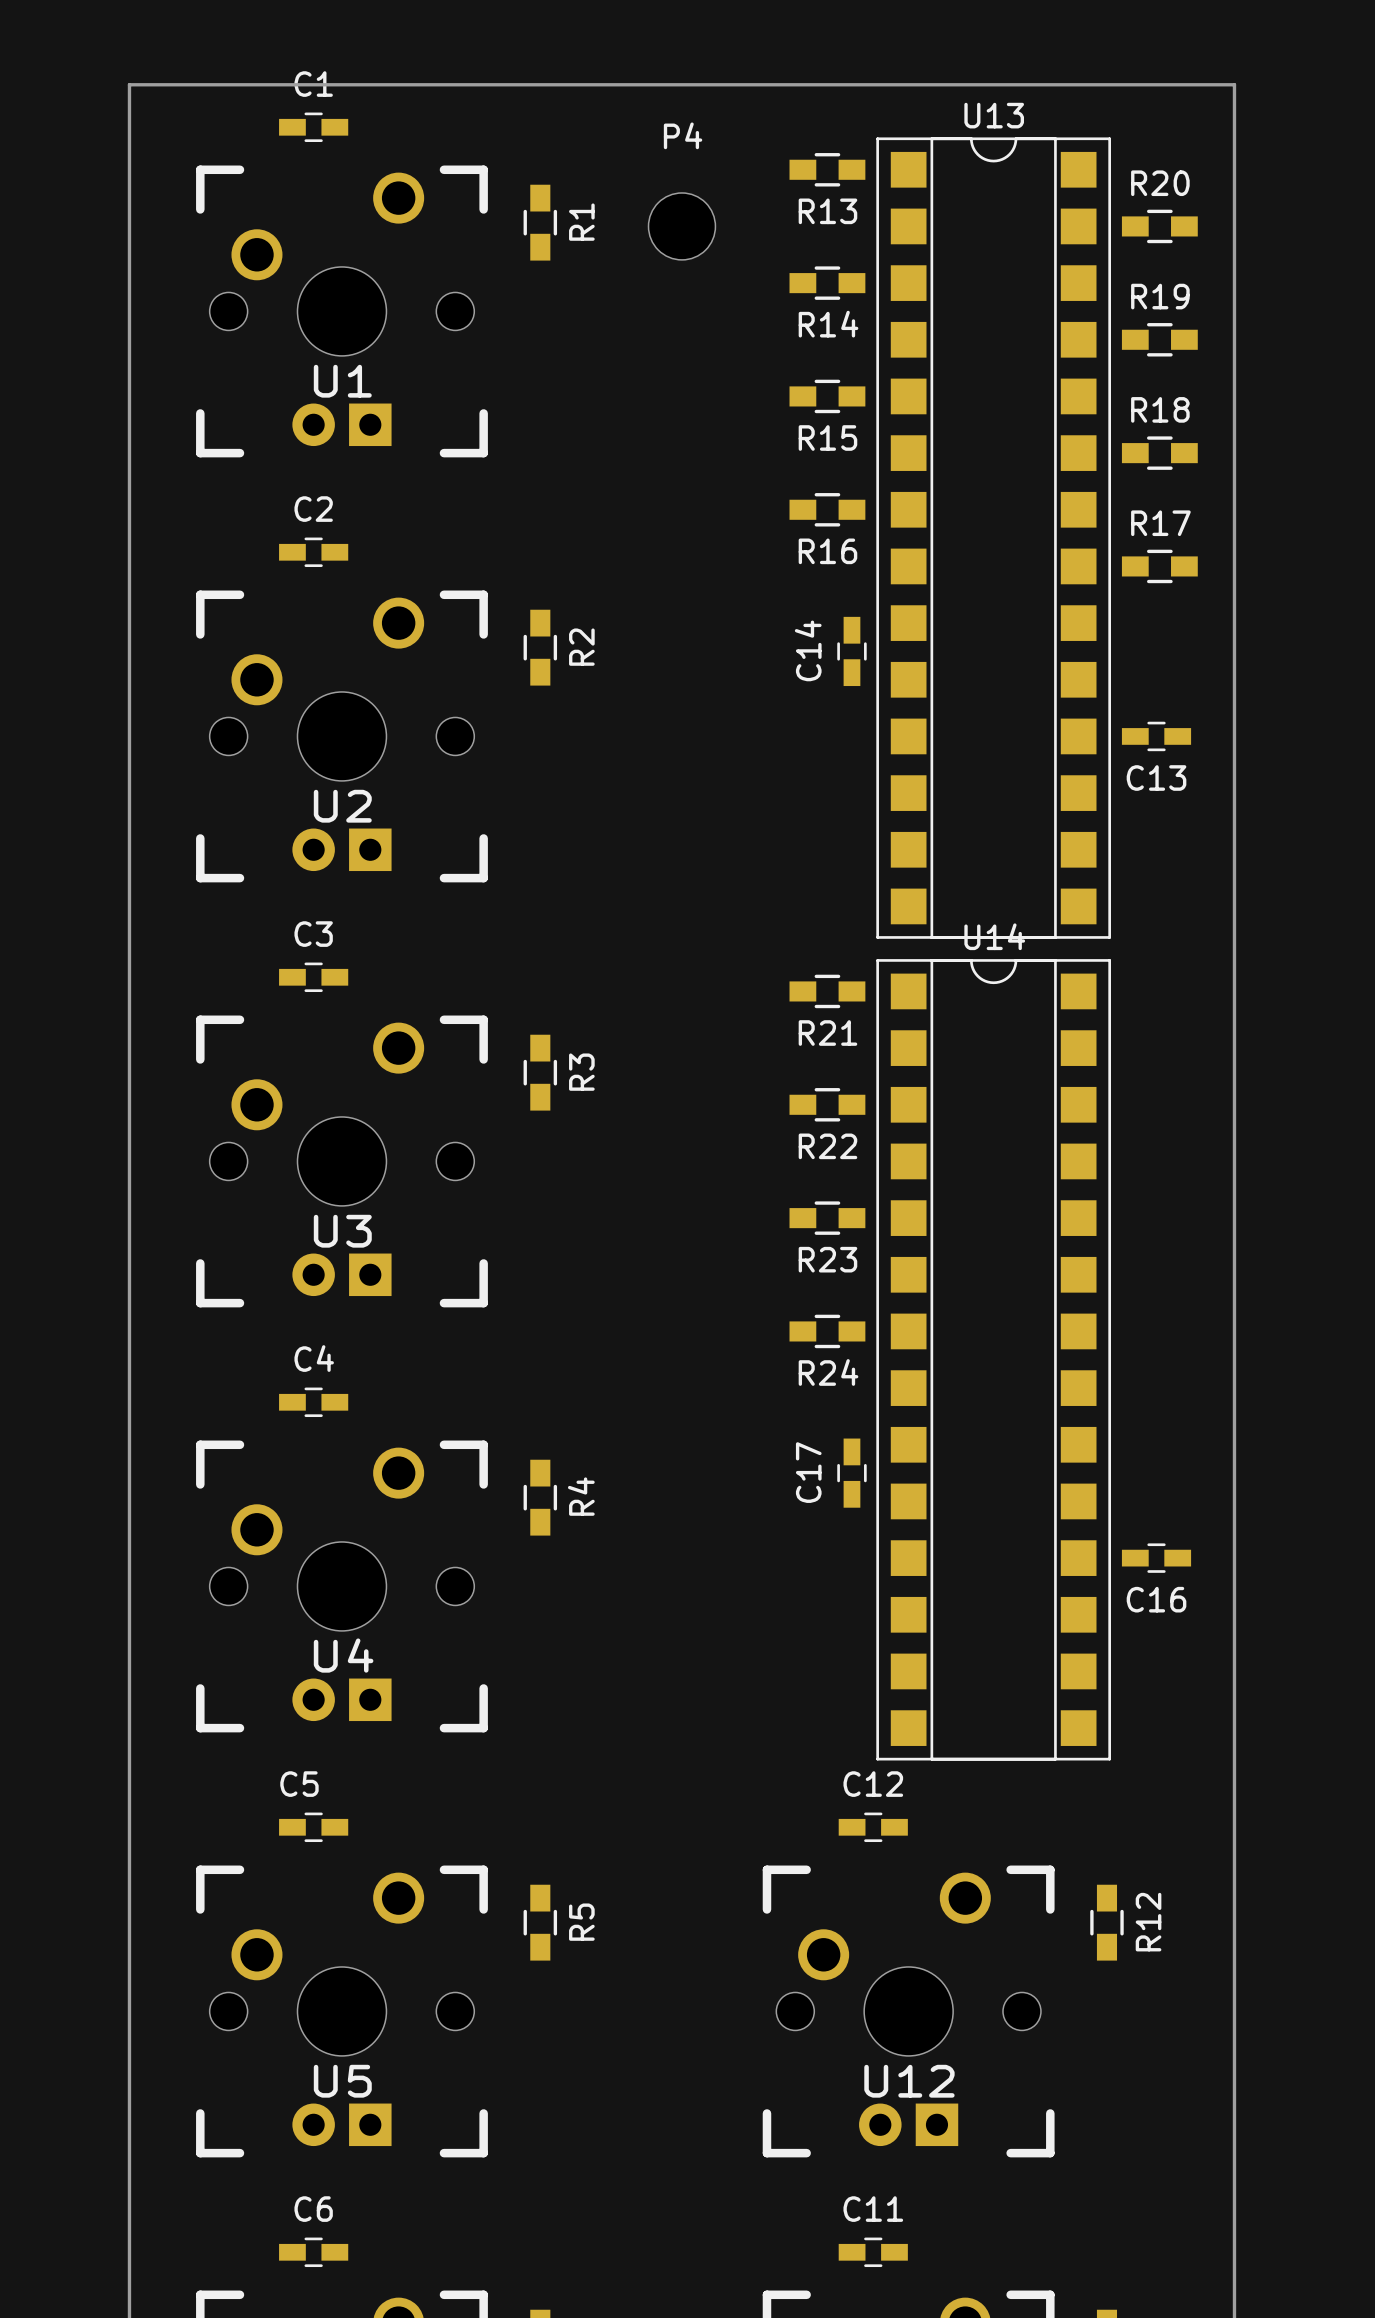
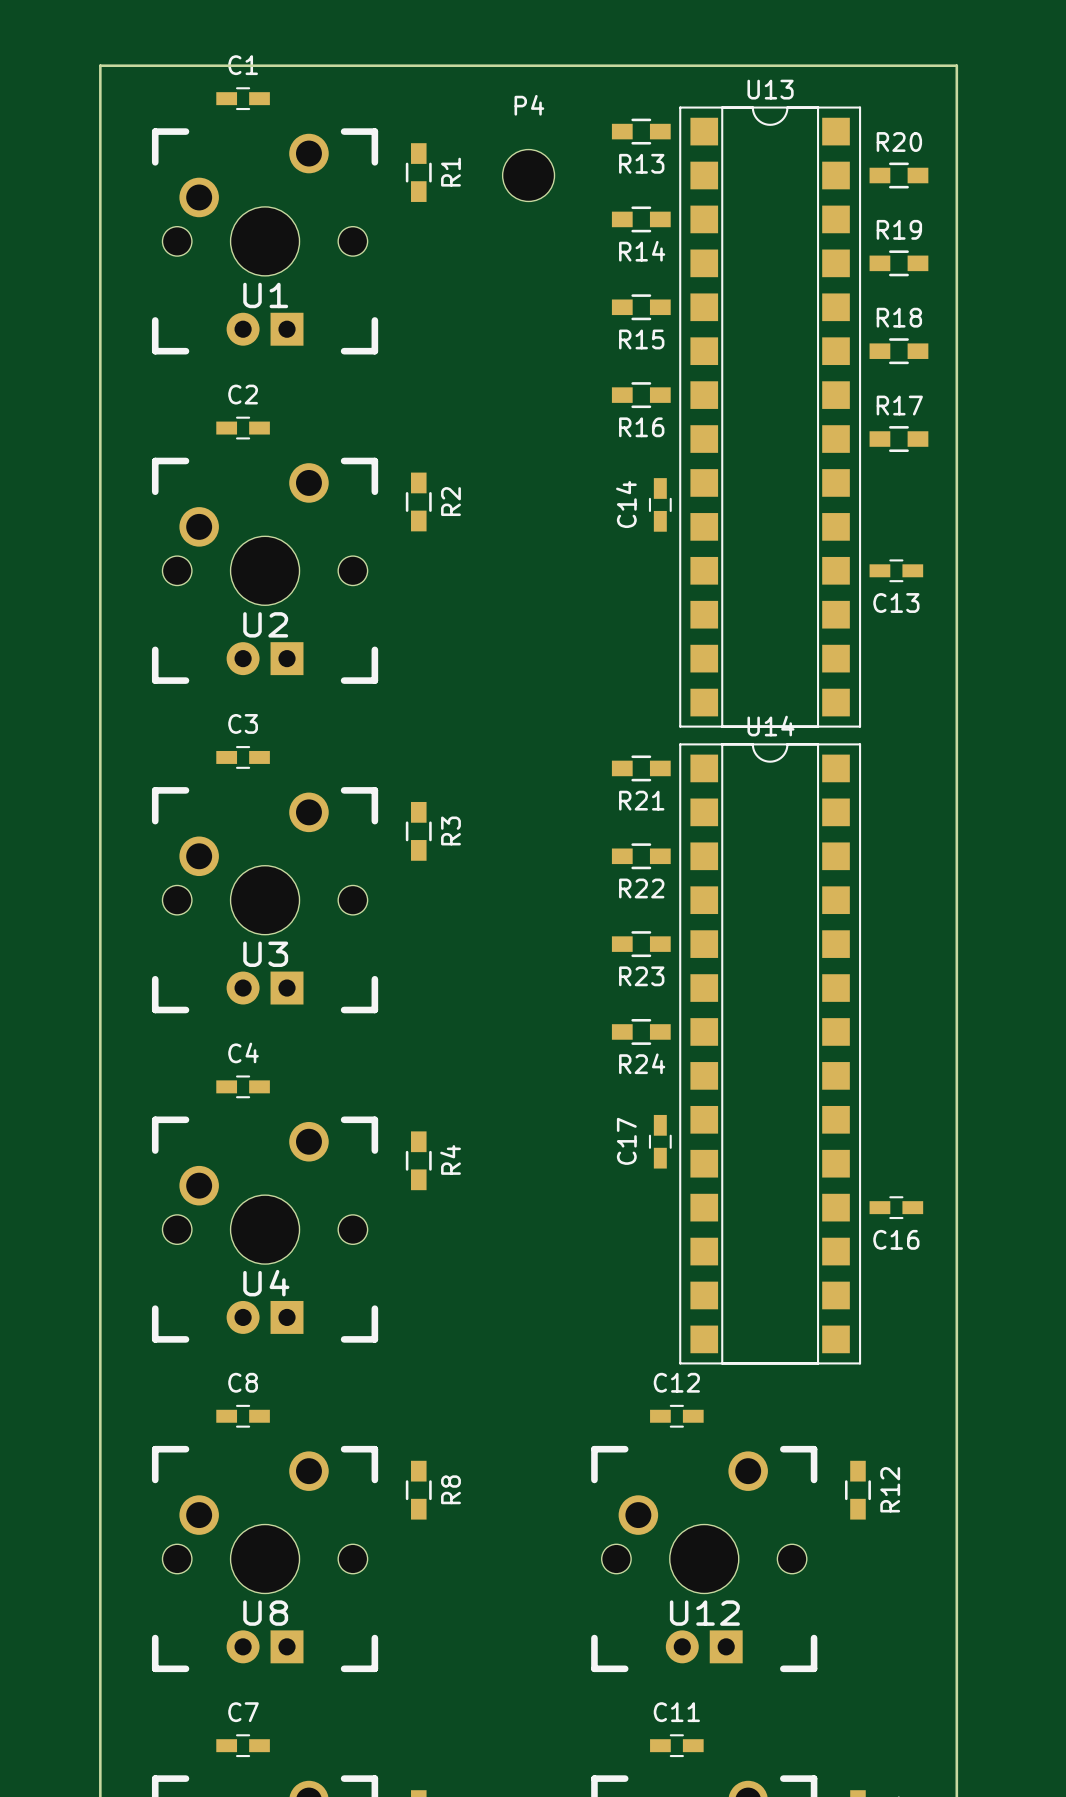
C5 name: C5 (299, 1784) -> C8 (243, 1382)
R5 name: R5 (581, 1922) -> R8 (450, 1489)
U5 name: U5 (342, 2081) -> U8 (265, 1613)
C6 name: C6 (313, 2209) -> C7 (243, 1712)

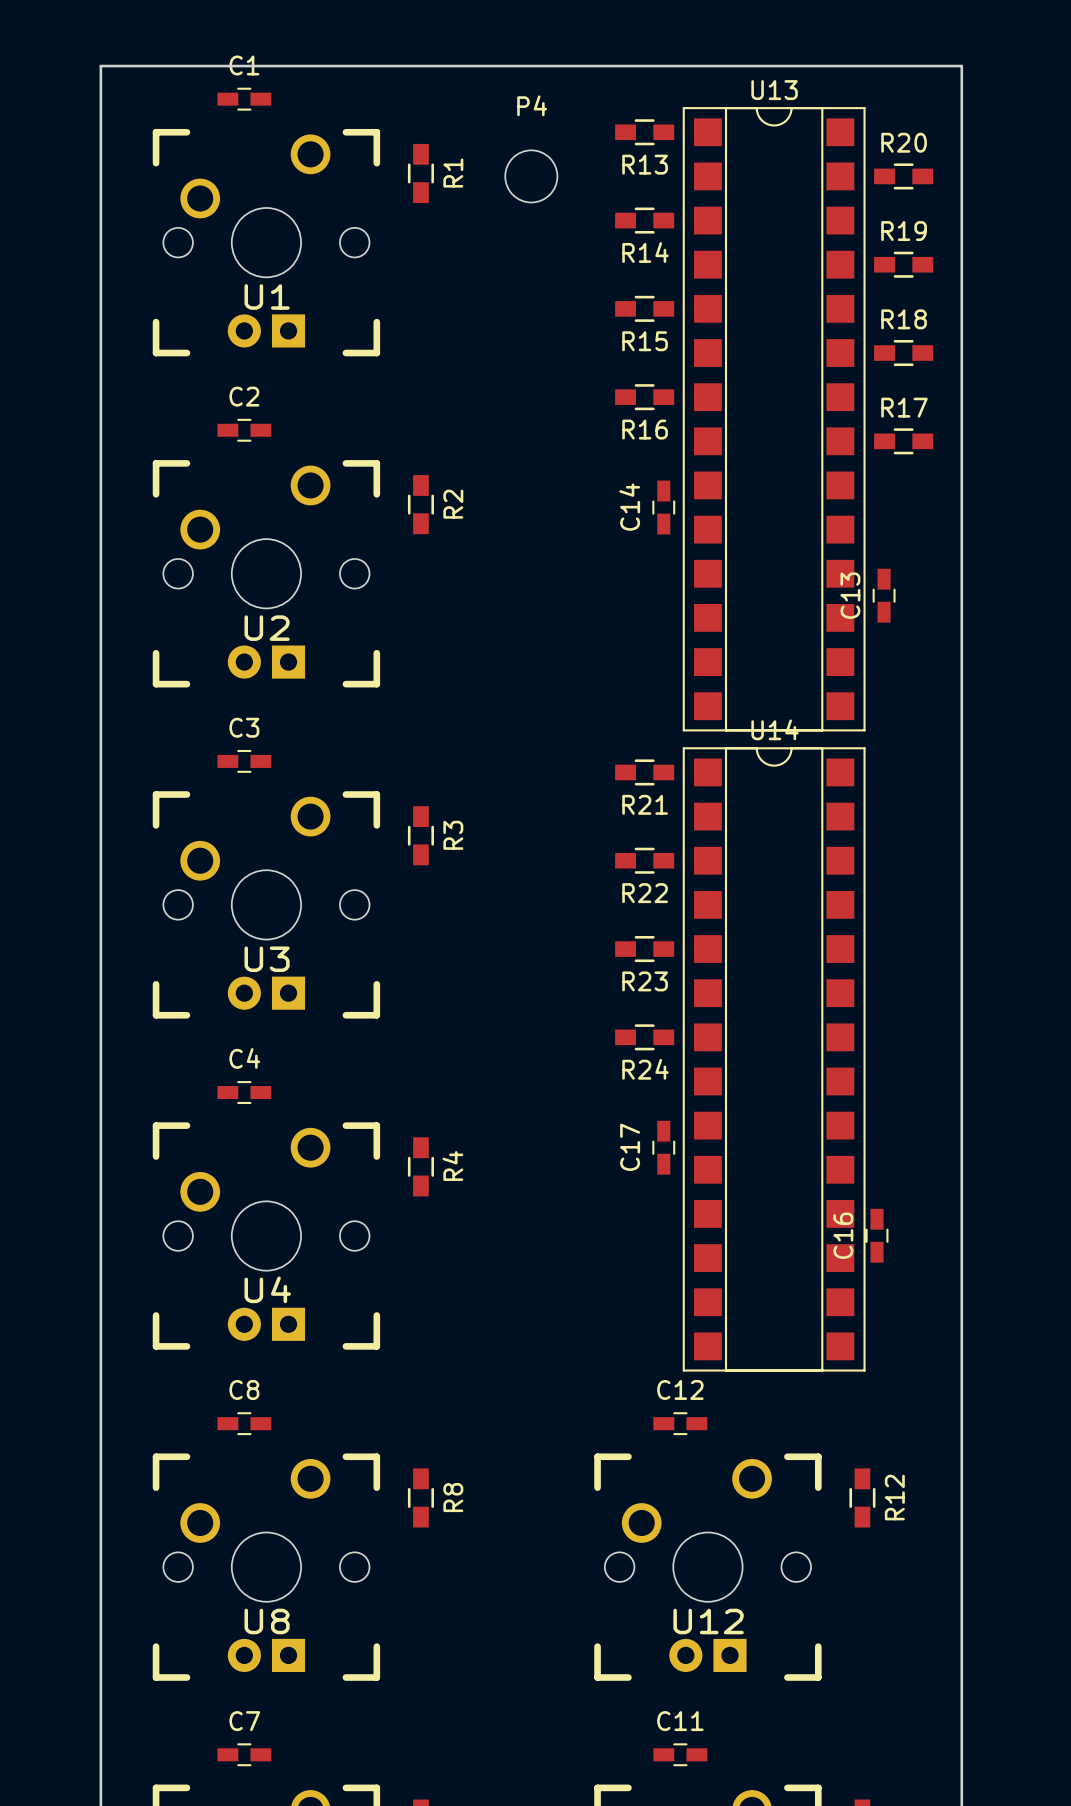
C13 rotation: 0° (896, 570) -> 90° clockwise (884, 595)
C16 rotation: 0° (896, 1207) -> 90° clockwise (877, 1235)
C16 position: (896, 1207) -> (877, 1235)

